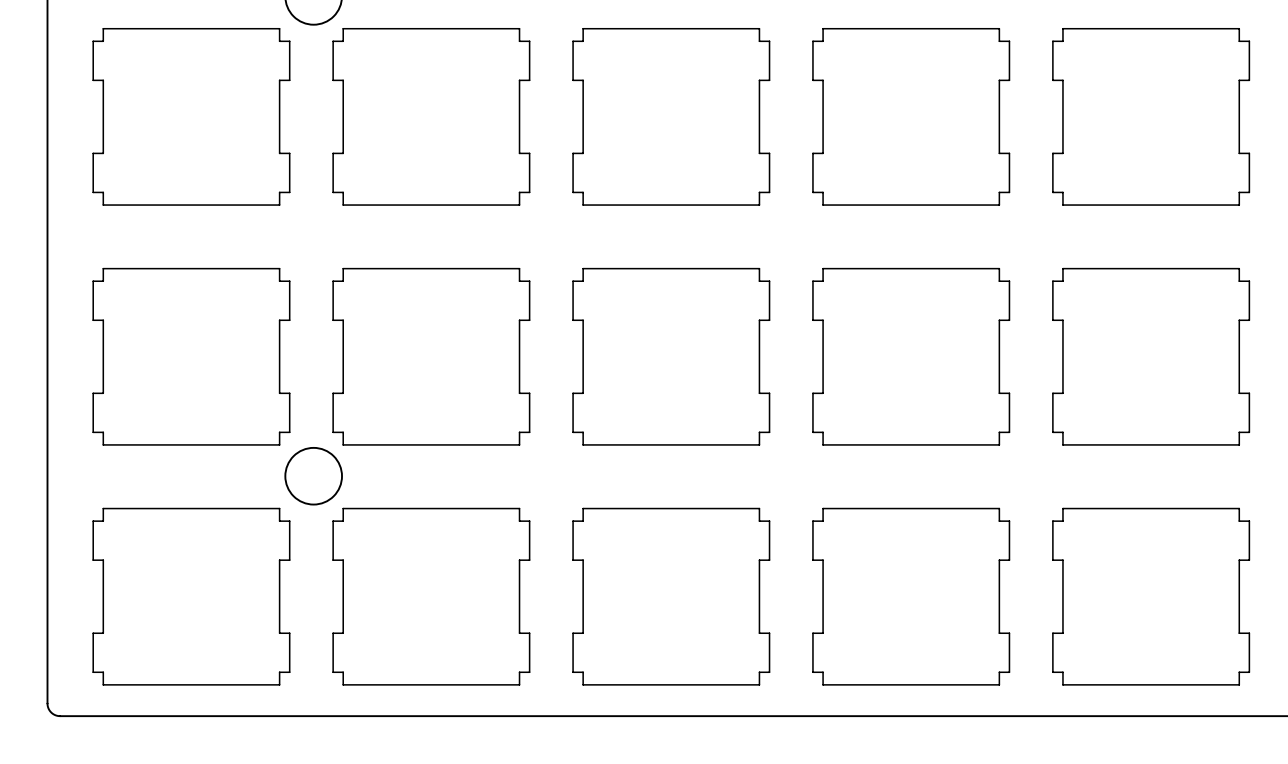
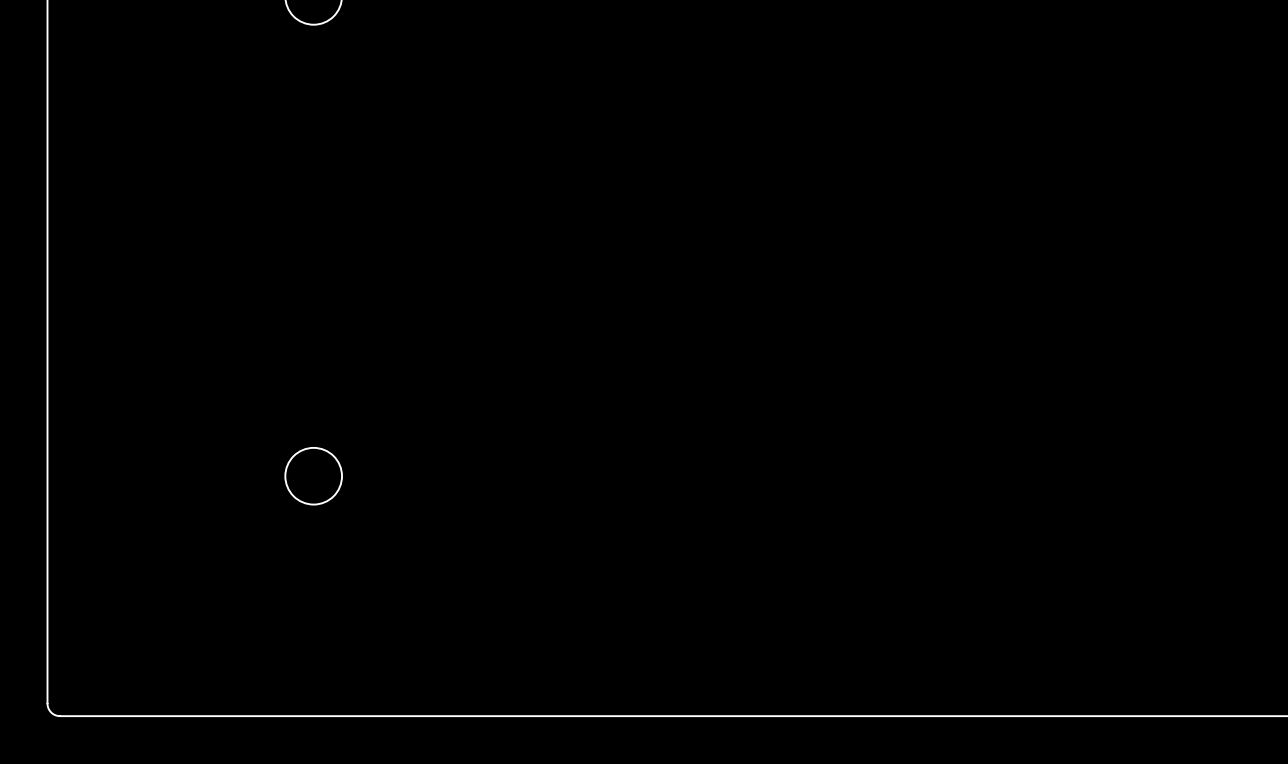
board edge: (279, 28) (103, 28) (103, 41) (93, 41) (93, 80) (103, 80) (103, 153) (93, 153) (93, 192) (103, 192) (103, 205) (279, 205) (279, 192) (289, 192) (289, 153) (279, 153) (279, 80) (289, 80) (289, 41) (279, 41) (279, 28) -> none
board edge: (519, 28) (343, 28) (343, 41) (333, 41) (333, 80) (343, 80) (343, 153) (333, 153) (333, 192) (343, 192) (343, 205) (519, 205) (519, 192) (529, 192) (529, 153) (519, 153) (519, 80) (529, 80) (529, 41) (519, 41) (519, 28) -> none
board edge: (759, 28) (583, 28) (583, 41) (573, 41) (573, 80) (583, 80) (583, 153) (573, 153) (573, 192) (583, 192) (583, 205) (759, 205) (759, 192) (769, 192) (769, 153) (759, 153) (759, 80) (769, 80) (769, 41) (759, 41) (759, 28) -> none
board edge: (999, 28) (823, 28) (823, 41) (812, 41) (812, 80) (823, 80) (823, 153) (812, 153) (812, 192) (823, 192) (823, 205) (999, 205) (999, 192) (1009, 192) (1009, 153) (999, 153) (999, 80) (1009, 80) (1009, 41) (999, 41) (999, 28) -> none
board edge: (1239, 28) (1239, 41) (1249, 41) (1249, 80) (1239, 80) (1239, 153) (1249, 153) (1249, 192) (1239, 192) (1239, 205) (1062, 205) (1062, 192) (1052, 192) (1052, 153) (1062, 153) (1062, 80) (1052, 80) (1052, 41) (1062, 41) (1062, 28) (1239, 28) -> none
board edge: (279, 268) (103, 268) (103, 281) (93, 281) (93, 320) (103, 320) (103, 393) (93, 393) (93, 432) (103, 432) (103, 444) (279, 444) (279, 432) (289, 432) (289, 393) (279, 393) (279, 320) (289, 320) (289, 281) (279, 281) (279, 268) -> none
board edge: (519, 268) (343, 268) (343, 281) (333, 281) (333, 320) (343, 320) (343, 393) (333, 393) (333, 432) (343, 432) (343, 444) (519, 444) (519, 432) (529, 432) (529, 393) (519, 393) (519, 320) (529, 320) (529, 281) (519, 281) (519, 268) -> none
board edge: (759, 268) (583, 268) (583, 281) (573, 281) (573, 320) (583, 320) (583, 393) (573, 393) (573, 432) (583, 432) (583, 444) (759, 444) (759, 432) (769, 432) (769, 393) (759, 393) (759, 320) (769, 320) (769, 281) (759, 281) (759, 268) -> none
board edge: (999, 268) (823, 268) (823, 281) (812, 281) (812, 320) (823, 320) (823, 393) (812, 393) (812, 432) (823, 432) (823, 444) (999, 444) (999, 432) (1009, 432) (1009, 393) (999, 393) (999, 320) (1009, 320) (1009, 281) (999, 281) (999, 268) -> none
board edge: (1239, 268) (1239, 281) (1249, 281) (1249, 320) (1239, 320) (1239, 393) (1249, 393) (1249, 432) (1239, 432) (1239, 444) (1062, 444) (1062, 432) (1052, 432) (1052, 393) (1062, 393) (1062, 320) (1052, 320) (1052, 281) (1062, 281) (1062, 268) (1239, 268) -> none
board edge: (279, 508) (103, 508) (103, 521) (93, 521) (93, 560) (103, 560) (103, 633) (93, 633) (93, 672) (103, 672) (103, 684) (279, 684) (279, 672) (289, 672) (289, 633) (279, 633) (279, 560) (289, 560) (289, 521) (279, 521) (279, 508) -> none
board edge: (519, 508) (343, 508) (343, 521) (333, 521) (333, 560) (343, 560) (343, 633) (333, 633) (333, 672) (343, 672) (343, 684) (519, 684) (519, 672) (529, 672) (529, 633) (519, 633) (519, 560) (529, 560) (529, 521) (519, 521) (519, 508) -> none
board edge: (759, 508) (583, 508) (583, 521) (573, 521) (573, 560) (583, 560) (583, 633) (573, 633) (573, 672) (583, 672) (583, 684) (759, 684) (759, 672) (769, 672) (769, 633) (759, 633) (759, 560) (769, 560) (769, 521) (759, 521) (759, 508) -> none
board edge: (999, 508) (823, 508) (823, 521) (812, 521) (812, 560) (823, 560) (823, 633) (812, 633) (812, 672) (823, 672) (823, 684) (999, 684) (999, 672) (1009, 672) (1009, 633) (999, 633) (999, 560) (1009, 560) (1009, 521) (999, 521) (999, 508) -> none
board edge: (1239, 508) (1239, 521) (1249, 521) (1249, 560) (1239, 560) (1239, 633) (1249, 633) (1249, 672) (1239, 672) (1239, 684) (1062, 684) (1062, 672) (1052, 672) (1052, 633) (1062, 633) (1062, 560) (1052, 560) (1052, 521) (1062, 521) (1062, 508) (1239, 508) -> none

